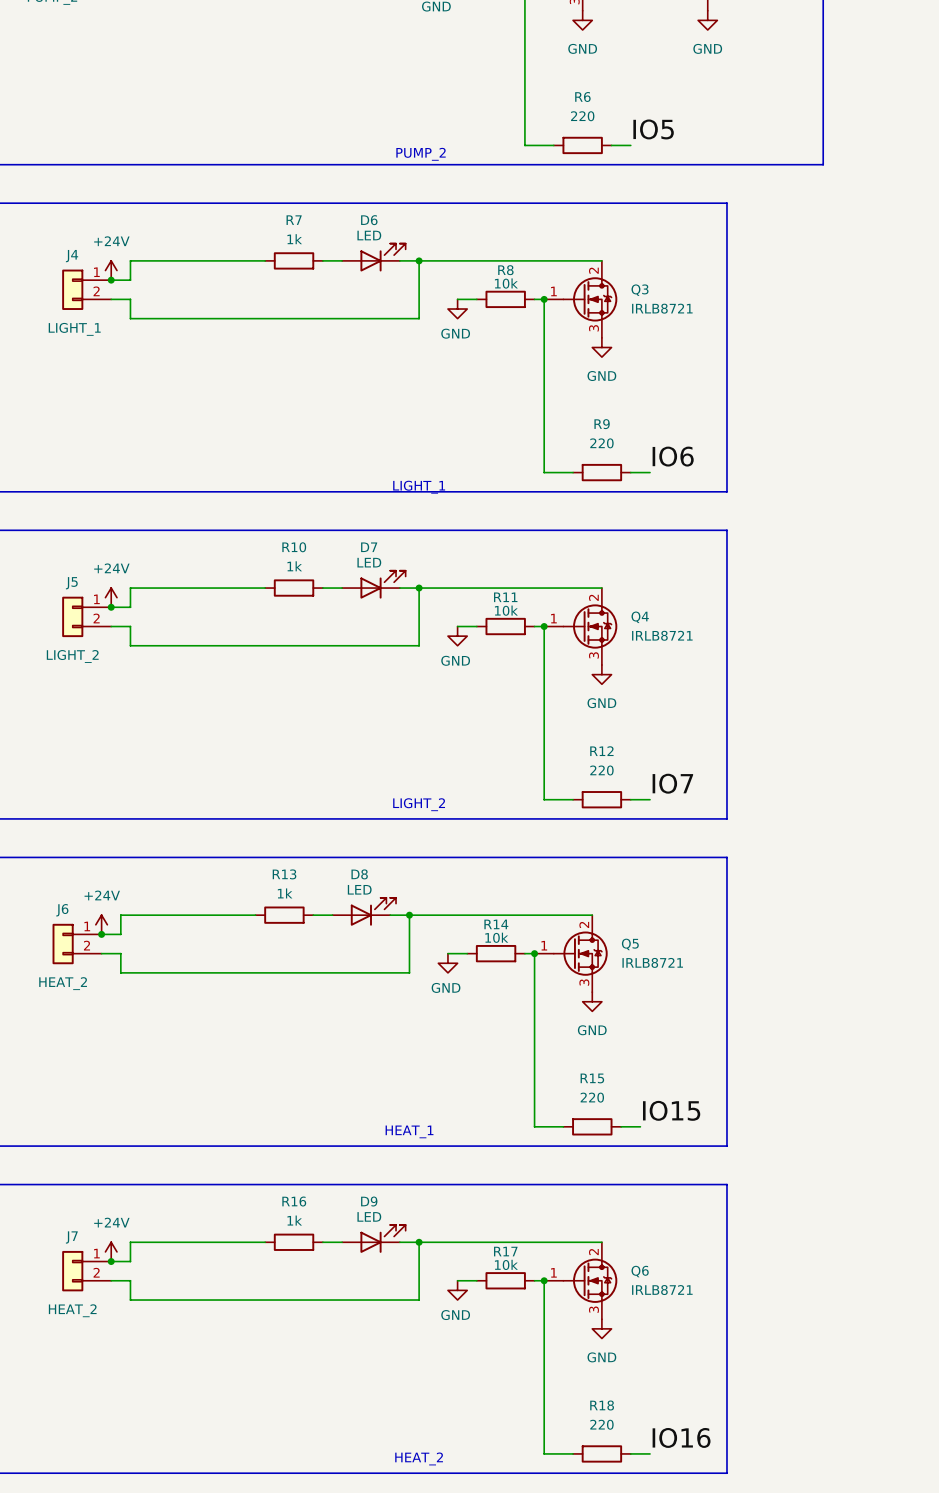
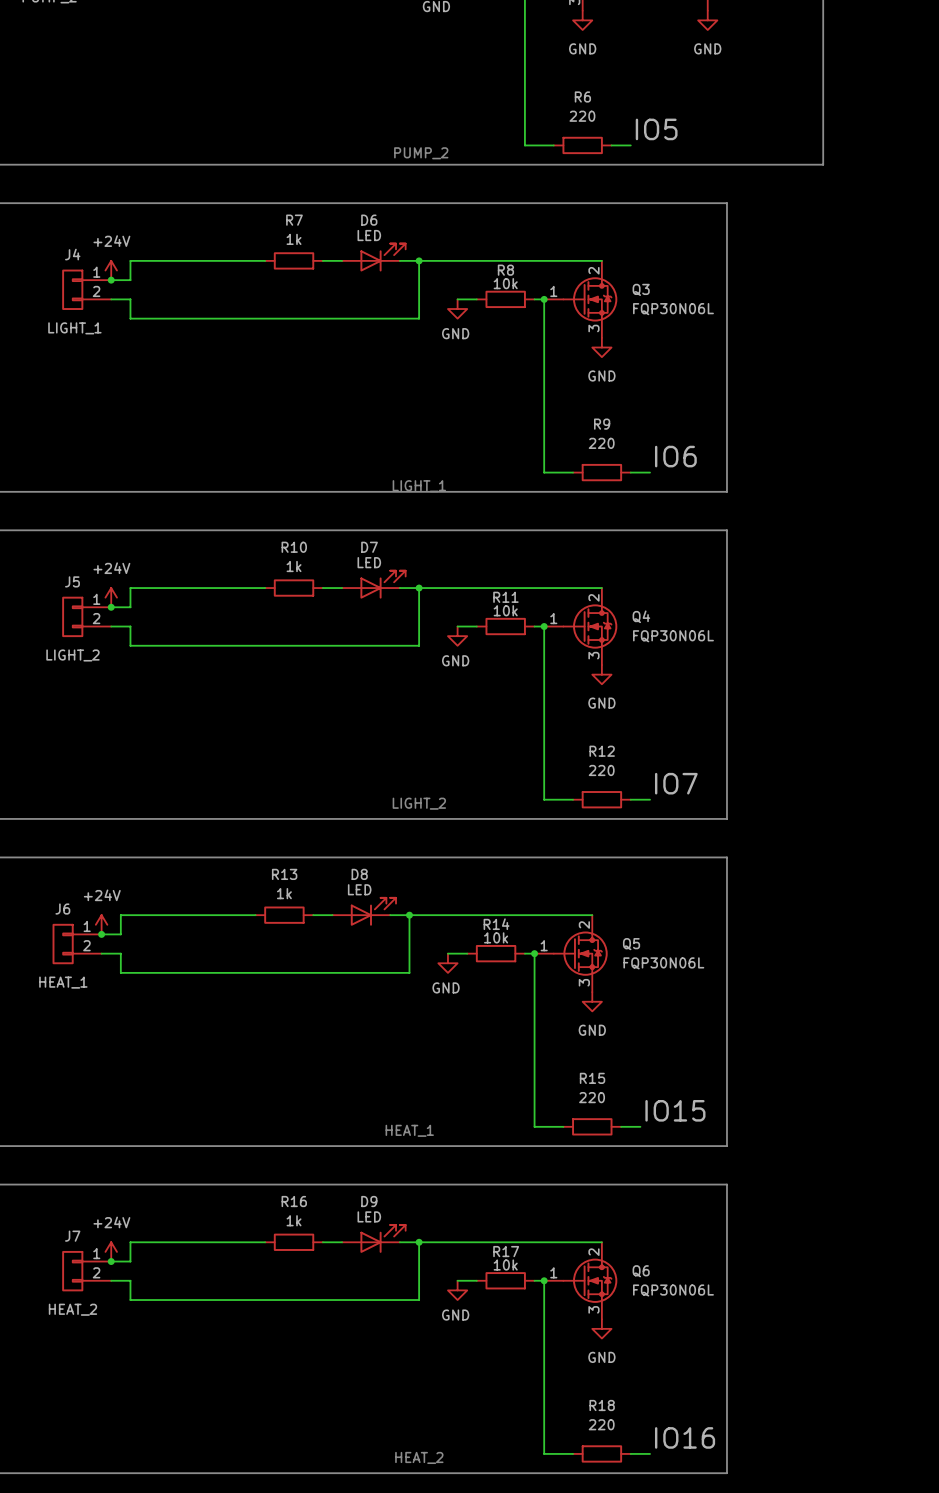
Q3 value: IRLB8721 (662, 308) -> FQP30N06L (673, 309)
Q4 value: IRLB8721 (662, 635) -> FQP30N06L (673, 636)
Q5 value: IRLB8721 (652, 962) -> FQP30N06L (663, 963)
J6 value: HEAT_2 (63, 983) -> HEAT_1 (63, 982)
Q6 value: IRLB8721 (662, 1290) -> FQP30N06L (673, 1290)

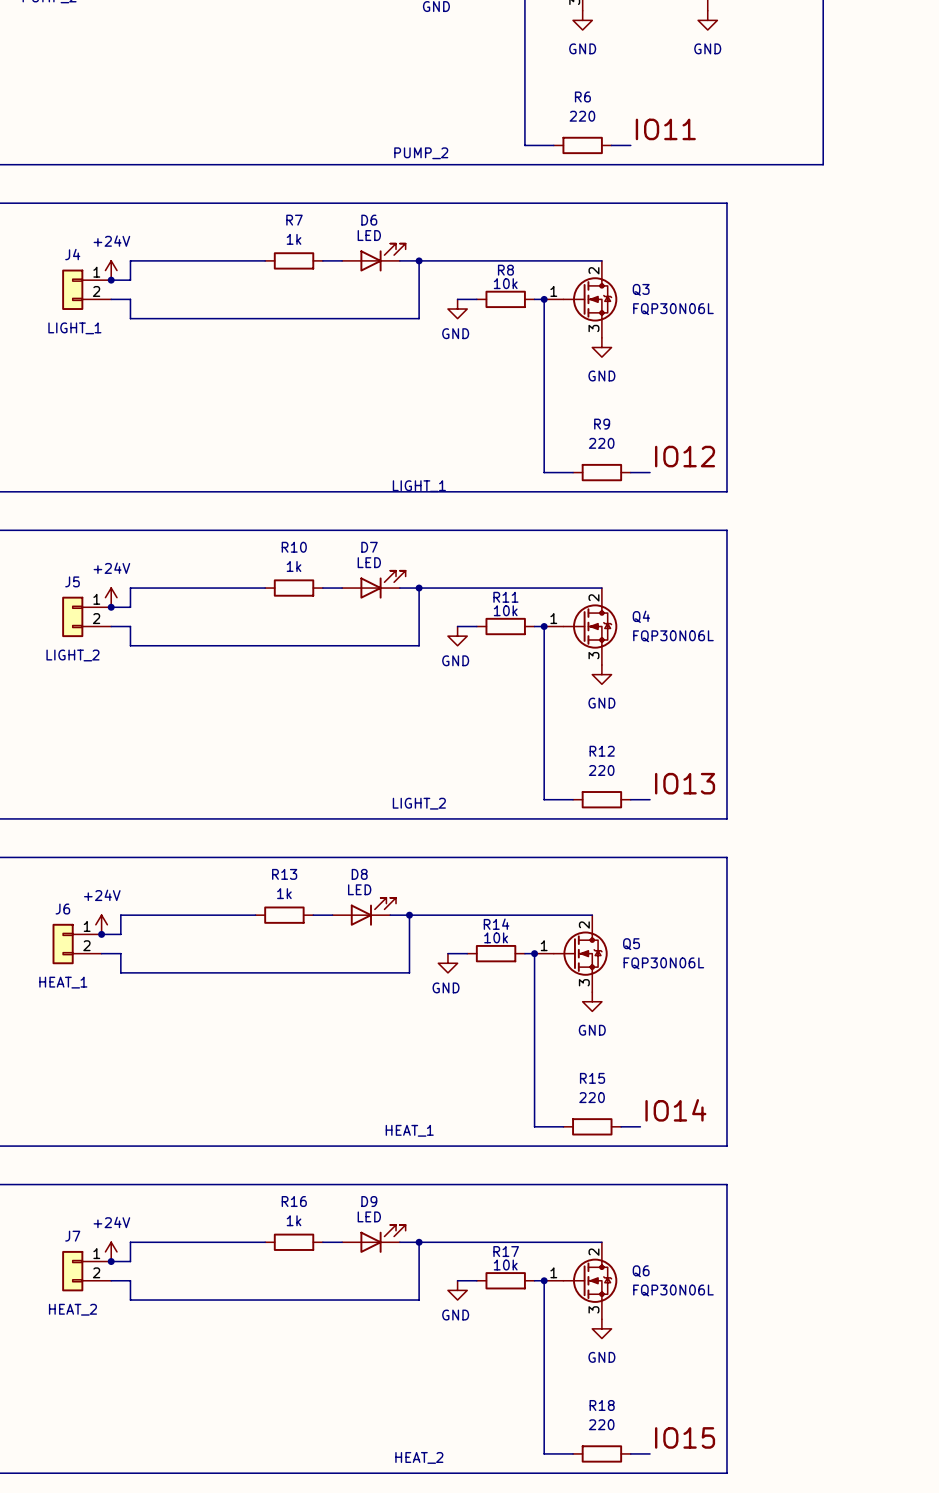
label: IO5 (656, 129) -> IO11 (665, 129)
label: IO6 (675, 456) -> IO12 (685, 456)
label: IO7 (676, 783) -> IO13 (685, 783)
label: IO15 (675, 1110) -> IO14 (675, 1110)
label: IO16 (685, 1437) -> IO15 (685, 1437)

